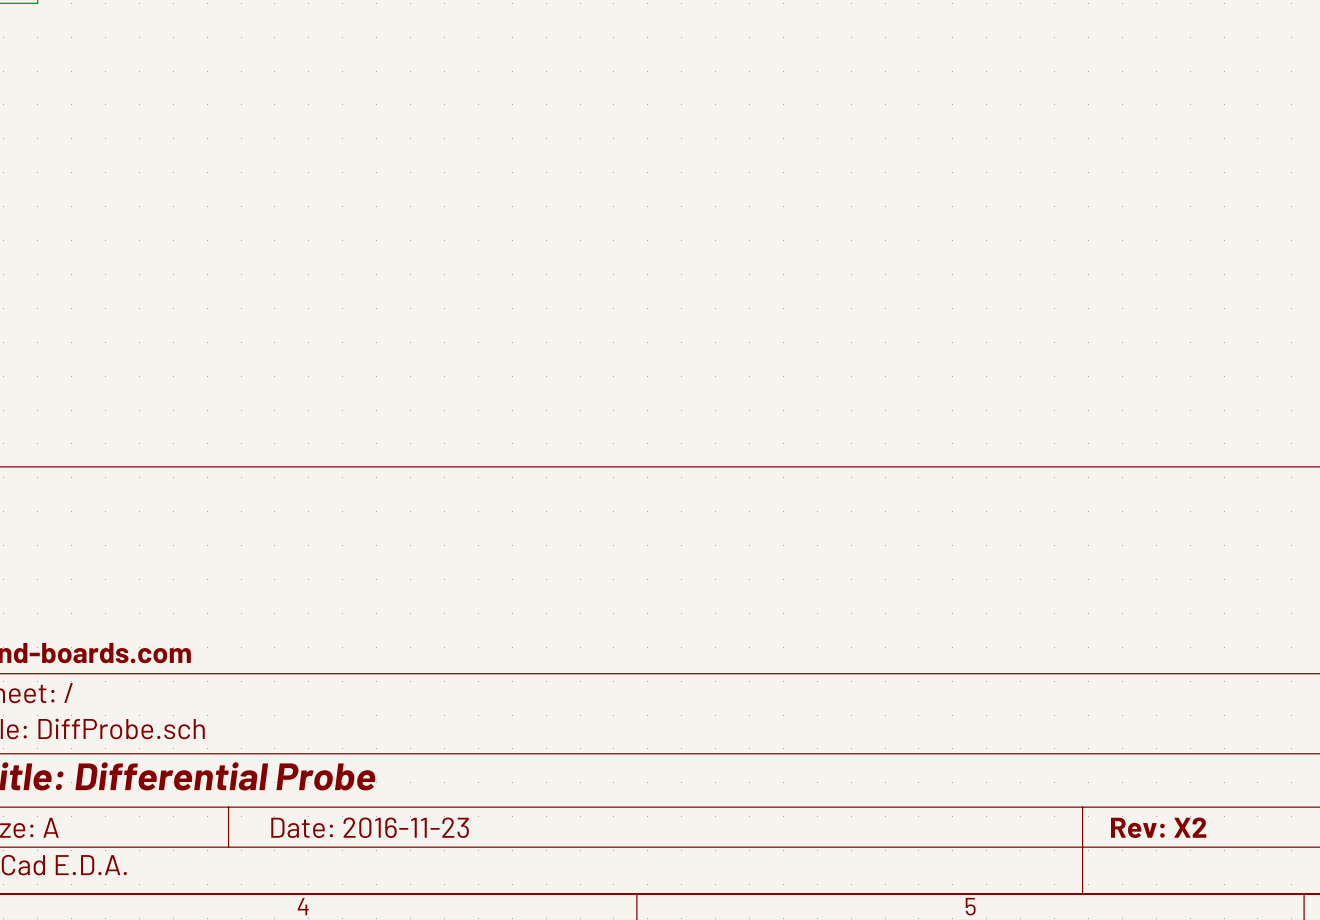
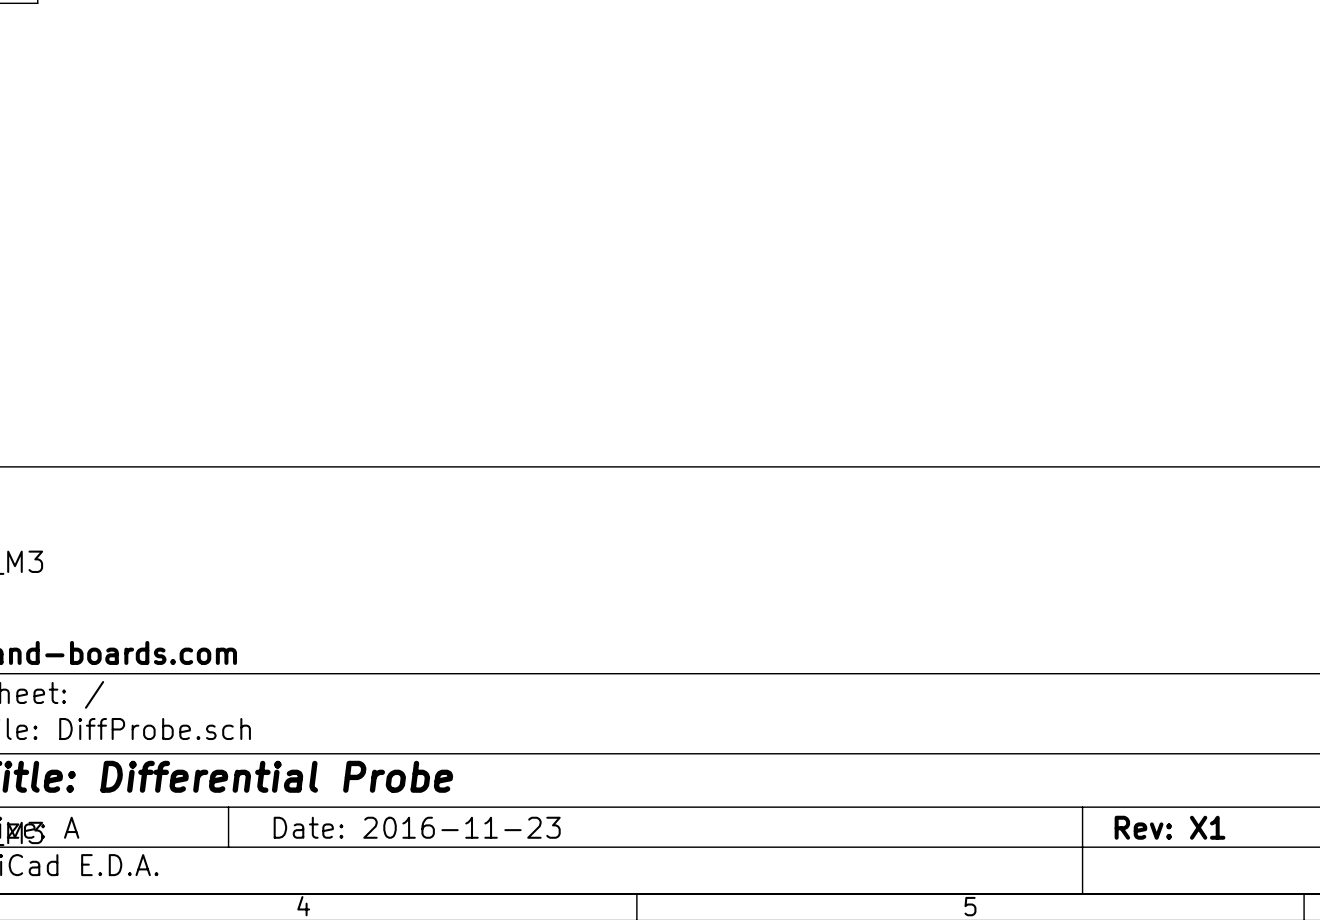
title block: Rev: X2 (1158, 827) -> Rev: X1 (1170, 827)

